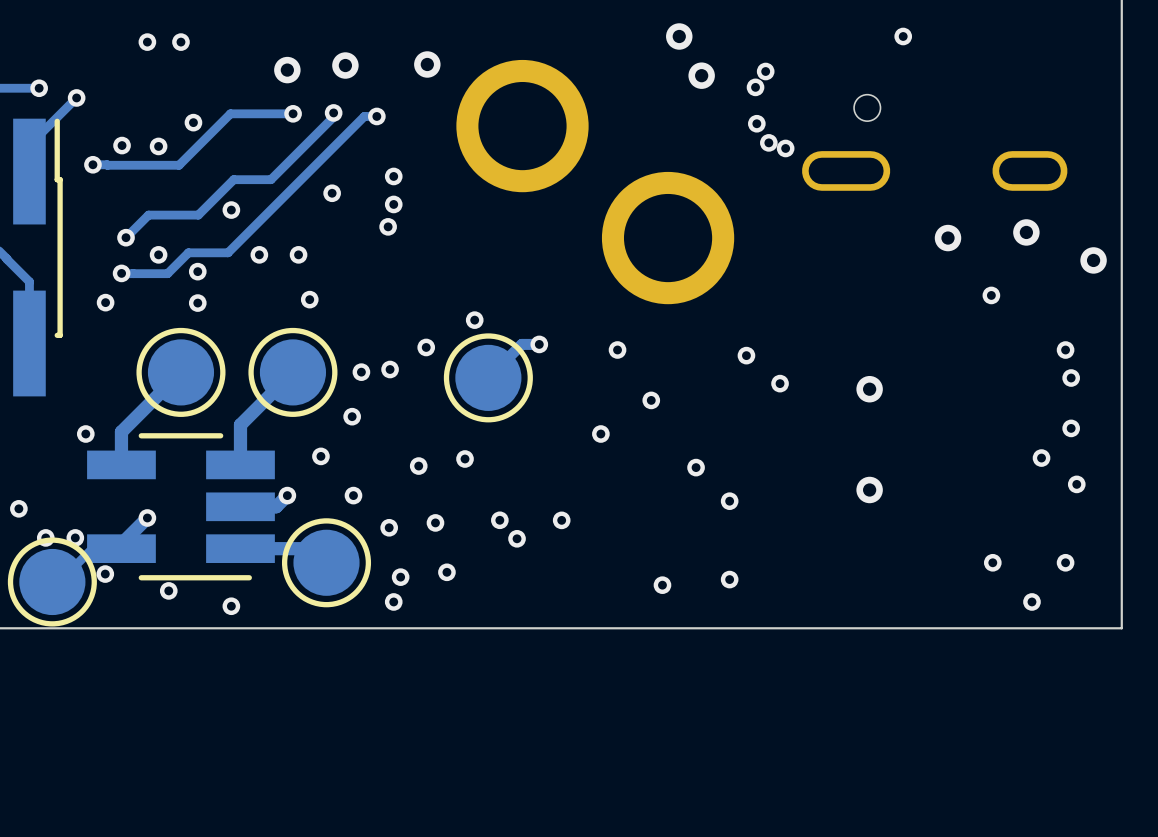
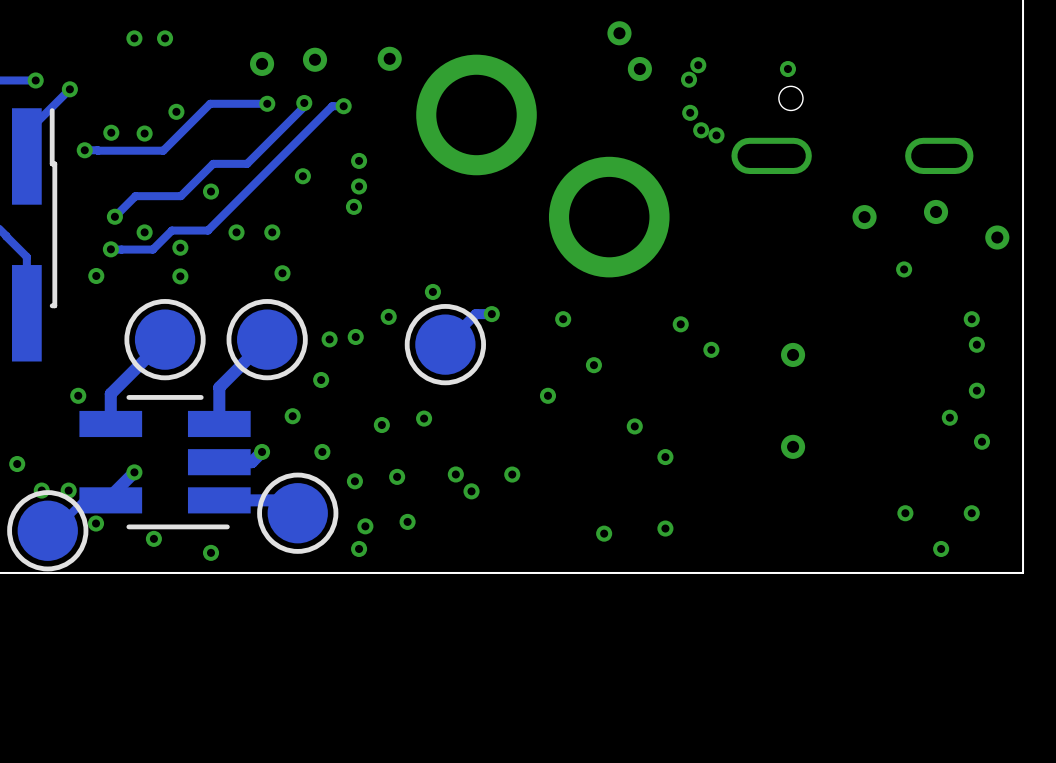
via position: (903, 36) -> (787, 69)

